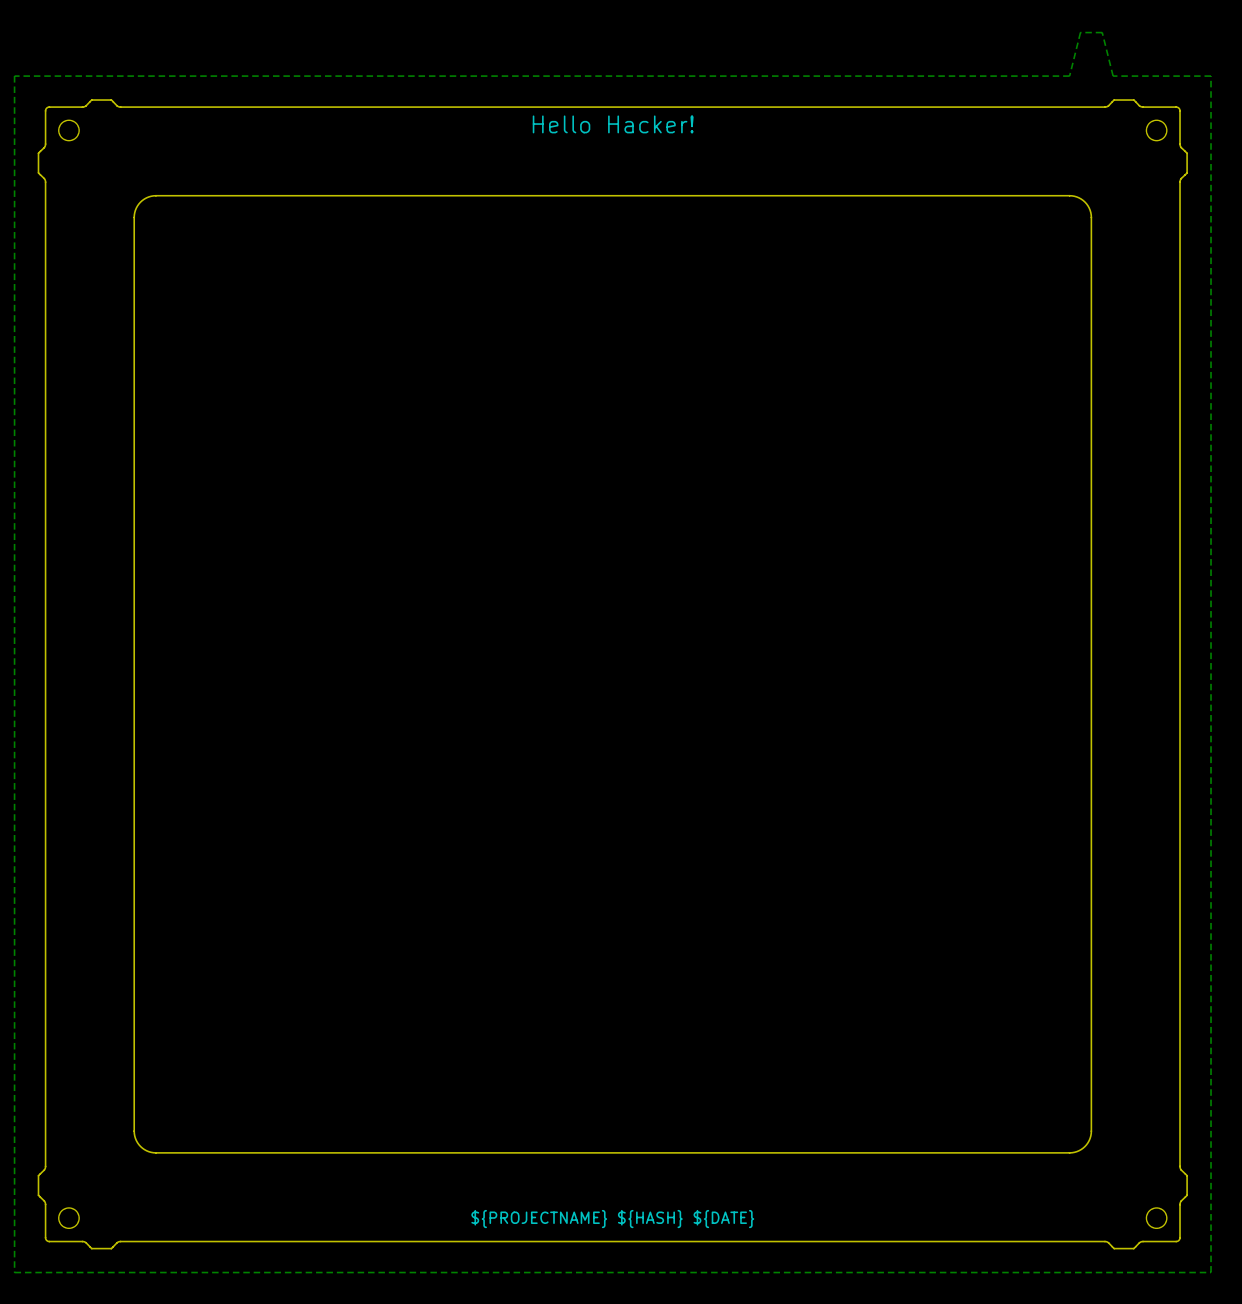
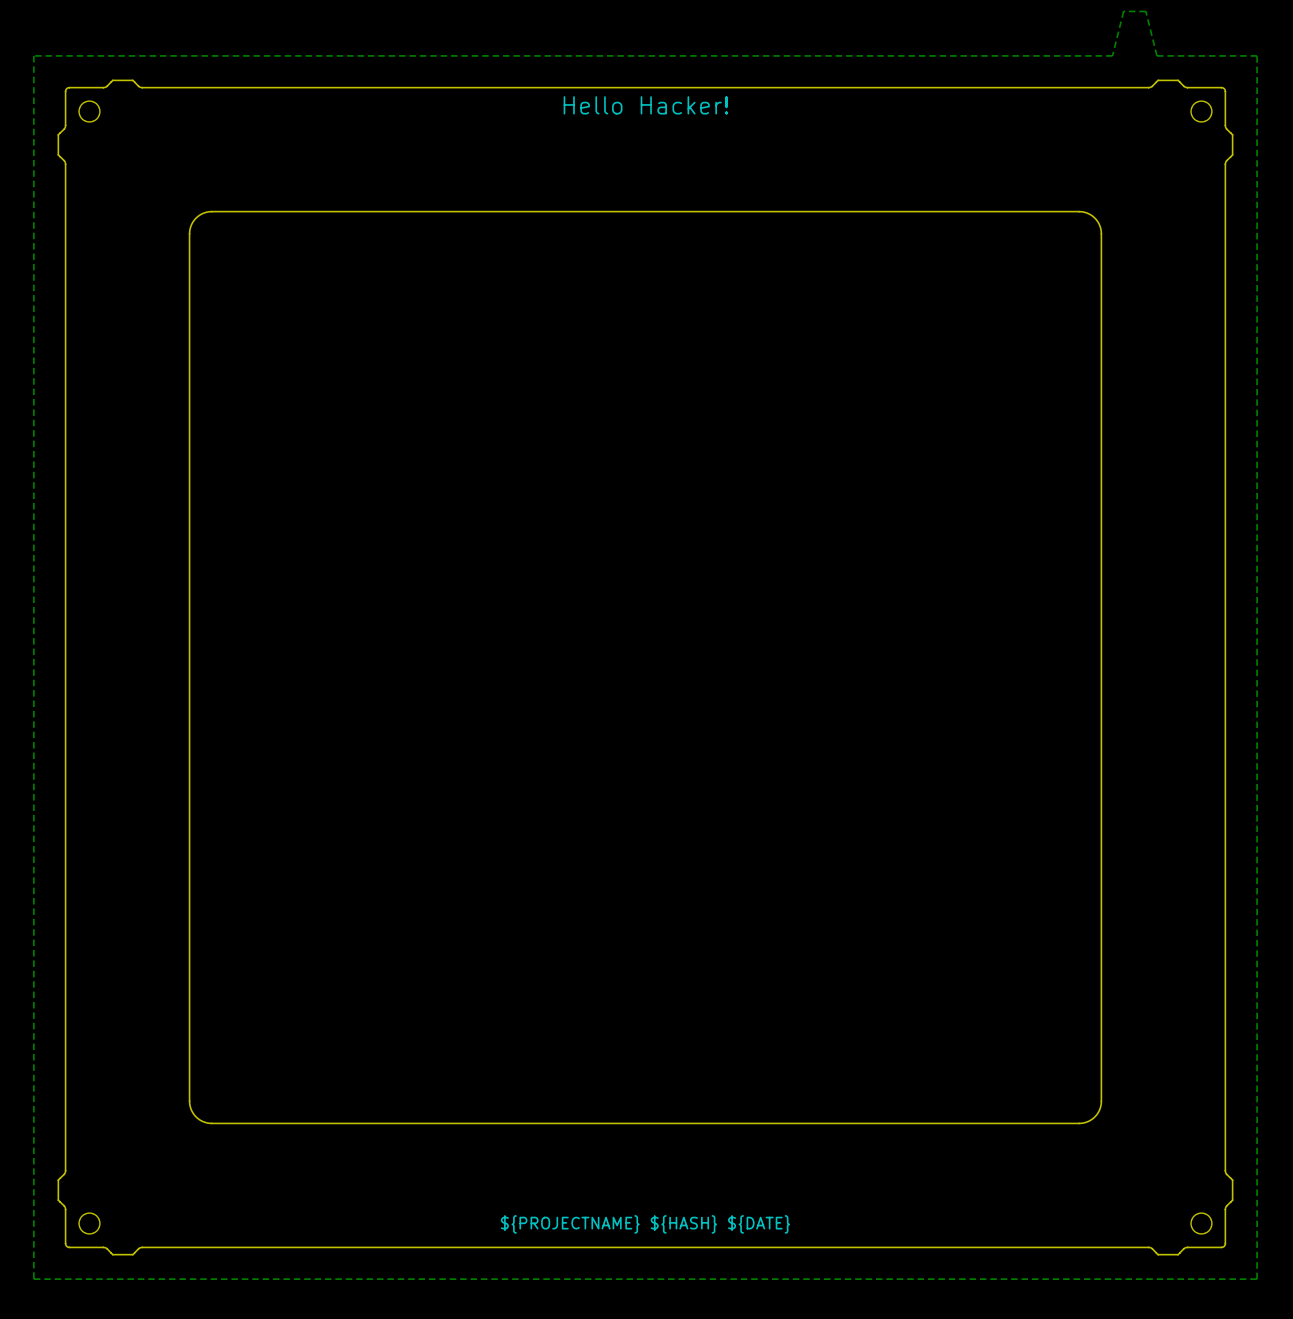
board edge: (1069, 195) (155, 195) (146, 197) (140, 202) (135, 210) (134, 217) (134, 1131) (135, 1138) (140, 1146) (148, 1151) (155, 1152) (1069, 1152) (1076, 1151) (1084, 1146) (1090, 1138) (1091, 1131) (1091, 217) (1090, 210) (1084, 202) (1079, 197) (1069, 195) -> (1079, 211) (1088, 213) (1094, 218) (1100, 226) (1101, 233) (1101, 1101) (1100, 1108) (1094, 1116) (1086, 1122) (1079, 1123) (211, 1123) (204, 1122) (196, 1116) (190, 1108) (189, 1101) (189, 233) (191, 224) (196, 218) (204, 212) (211, 211) (1079, 211)

